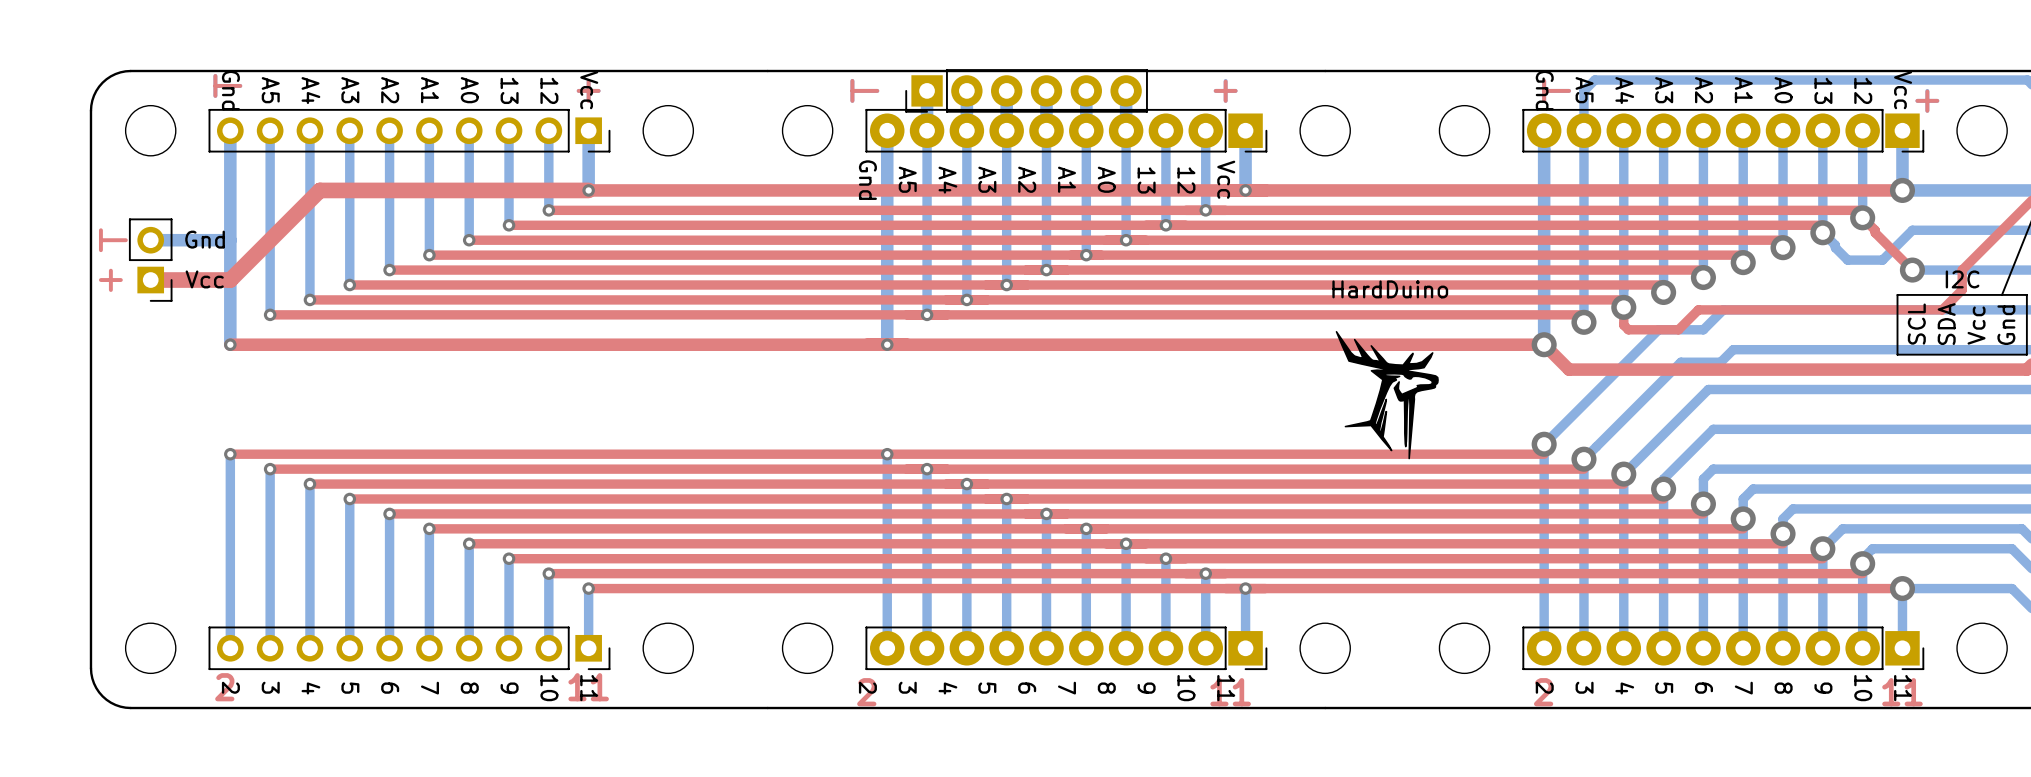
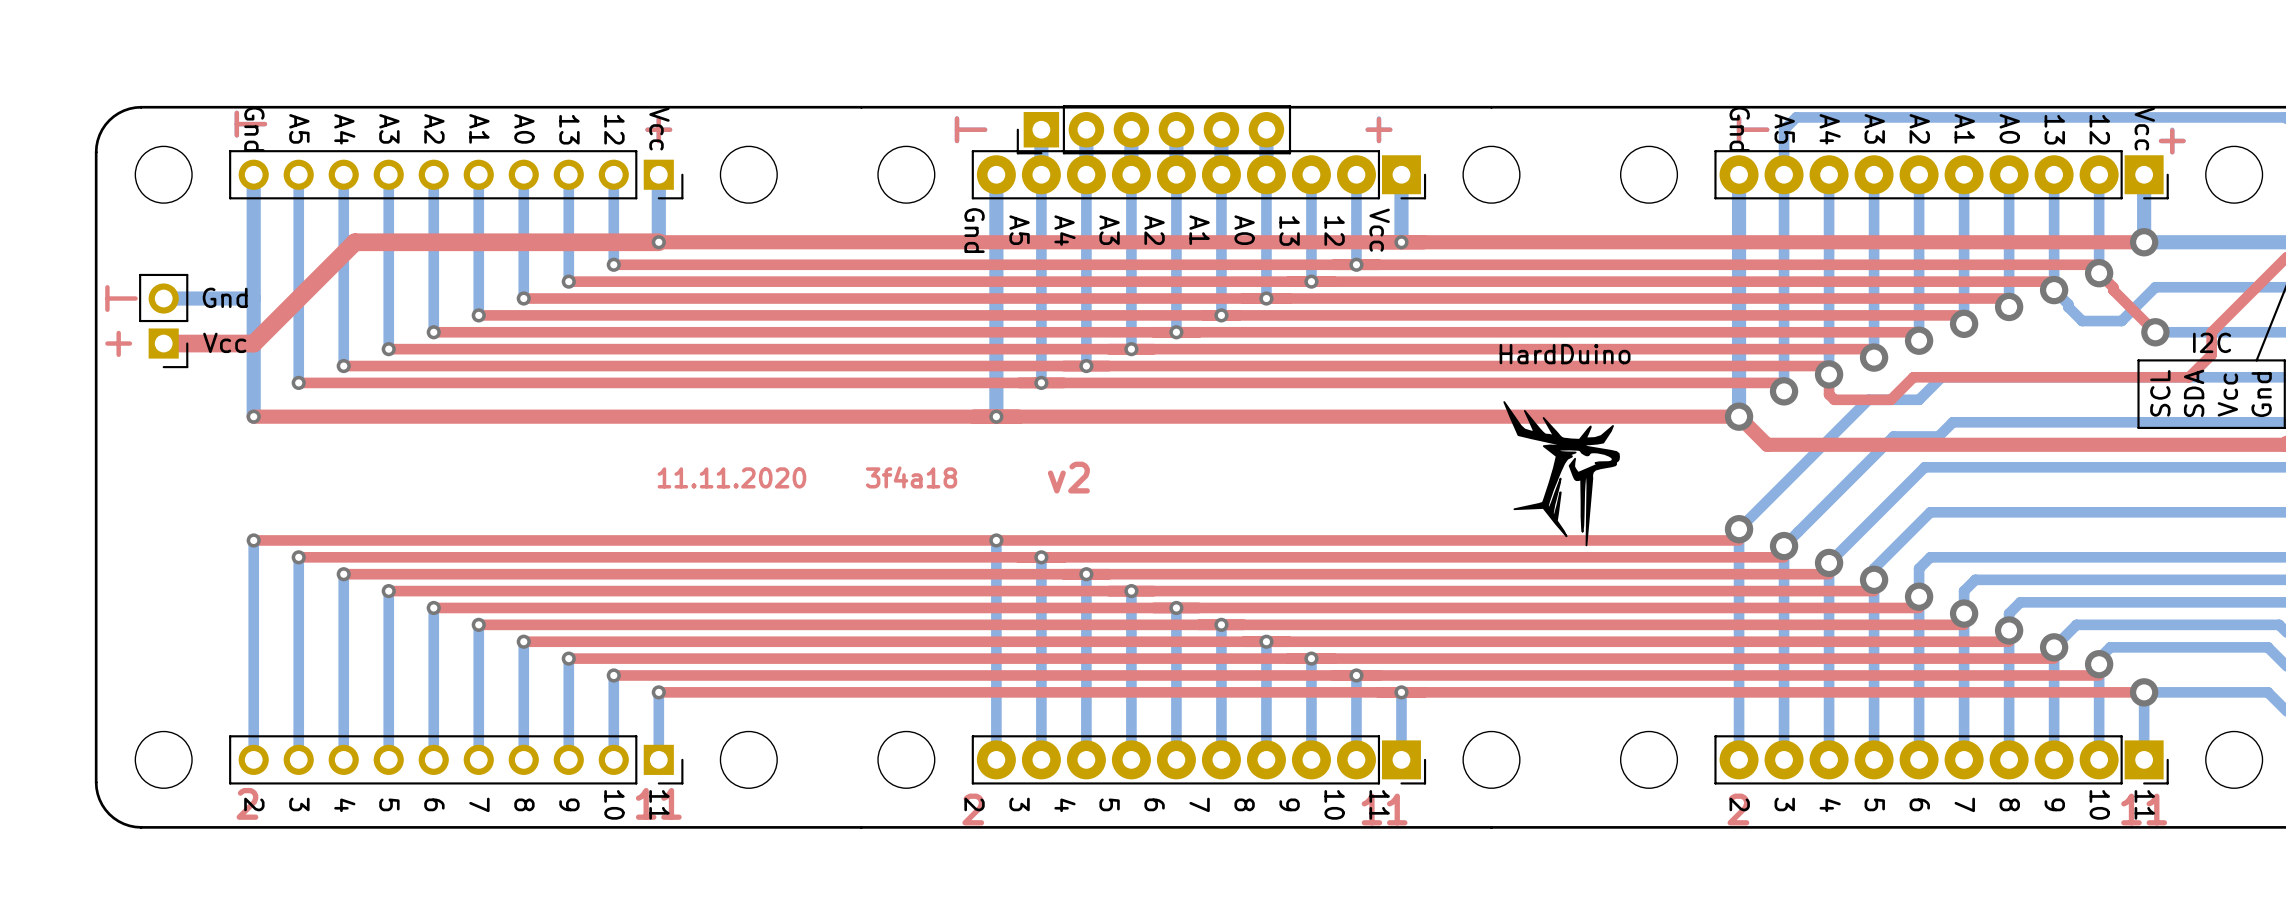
text: none -> 11.11.2020 (731, 477)
text: none -> 3f4a18 (911, 477)
text: none -> v2 (1068, 477)

